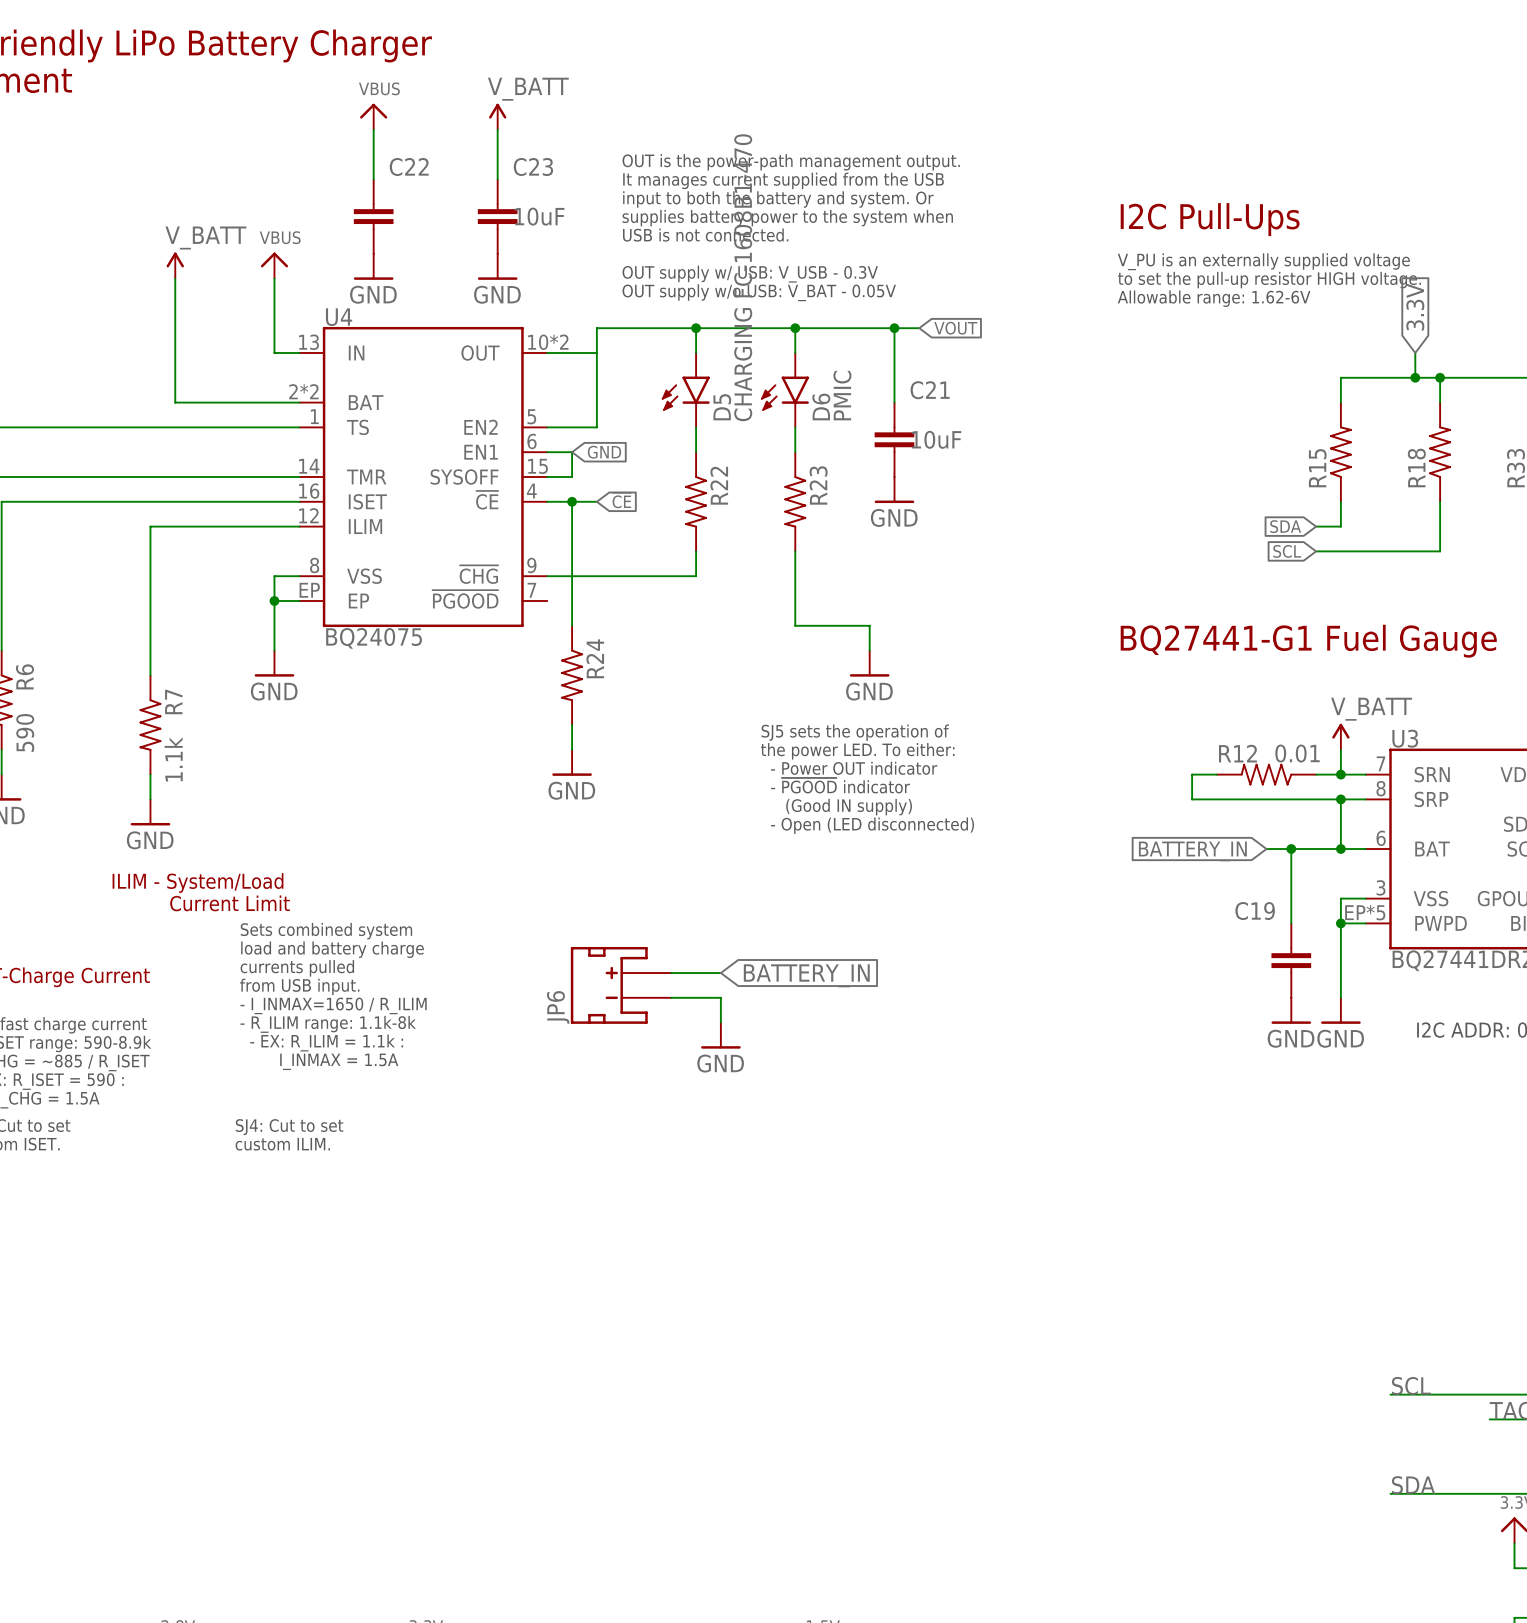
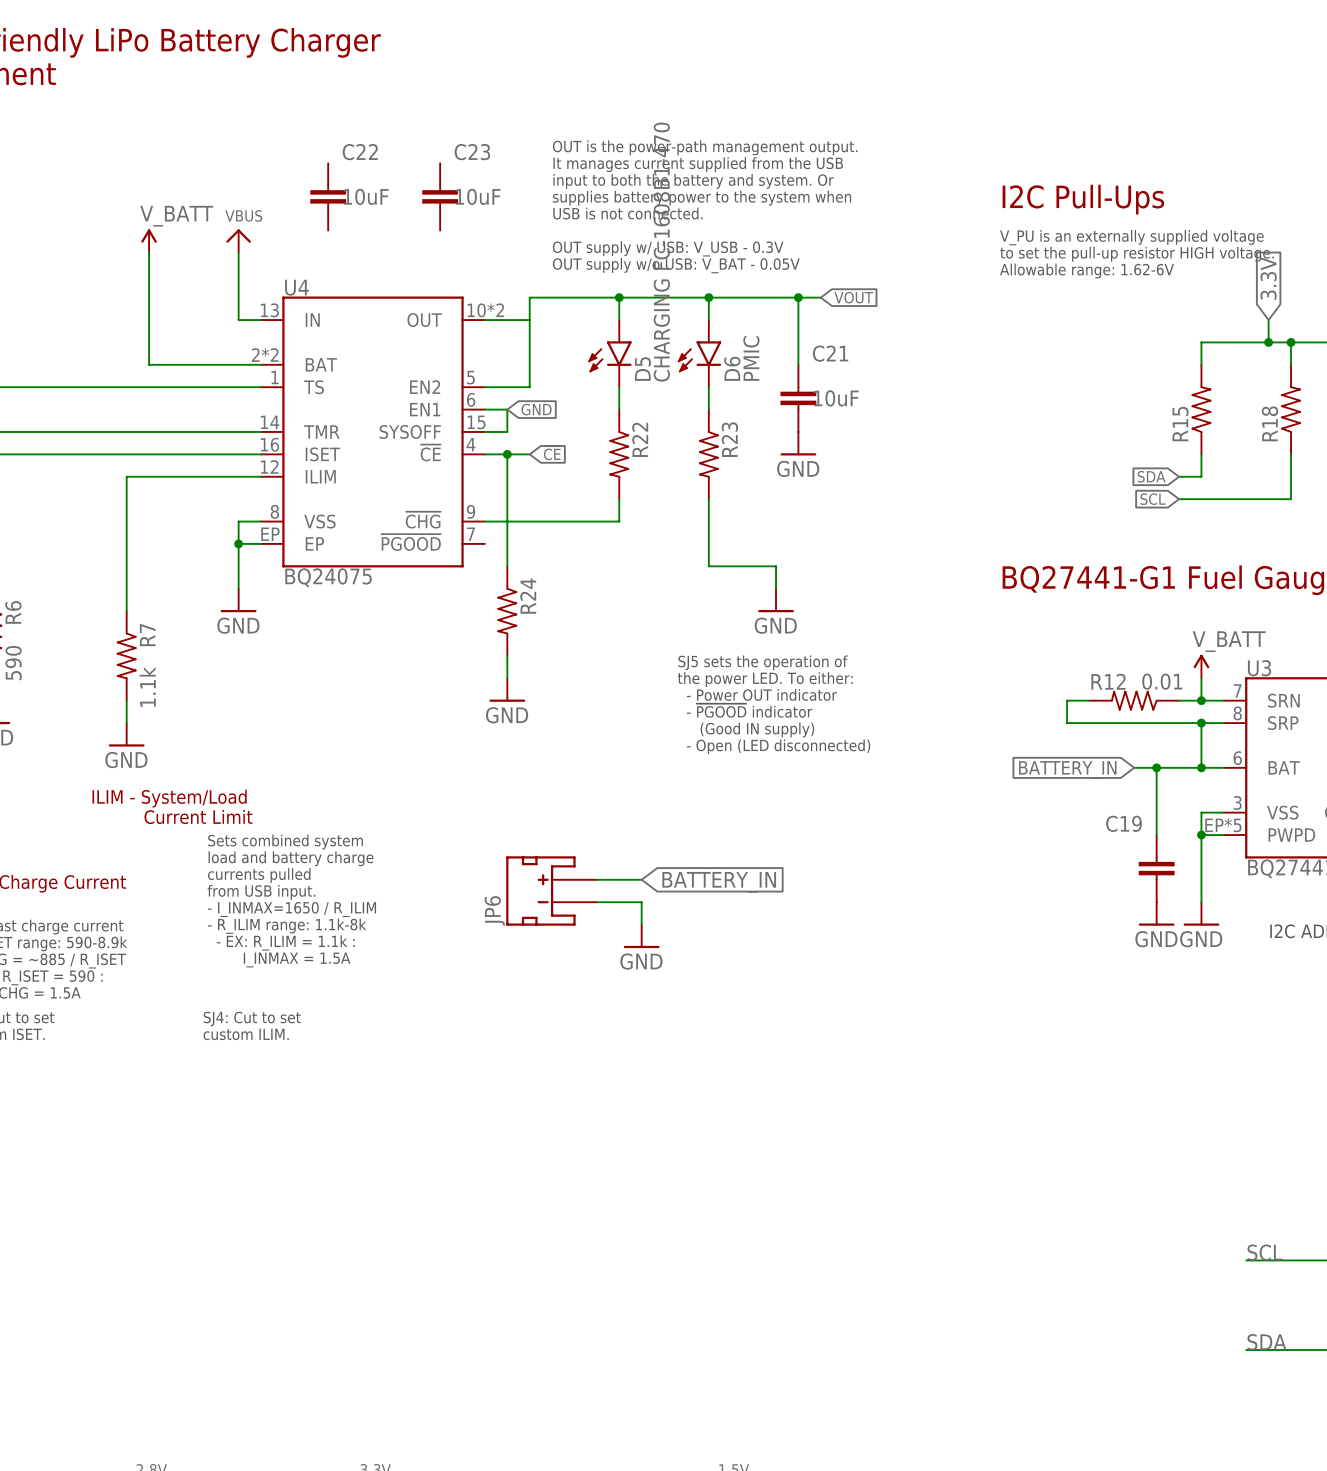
power symbol: VBUS (373, 116) -> none
power symbol: V_BATT (497, 116) -> none
wire: (373, 129) (373, 179) -> none
wire: (497, 129) (497, 179) -> none
C22 value: none -> 10uF (366, 196)
power symbol: GND (373, 266) -> none
power symbol: GND (497, 266) -> none

